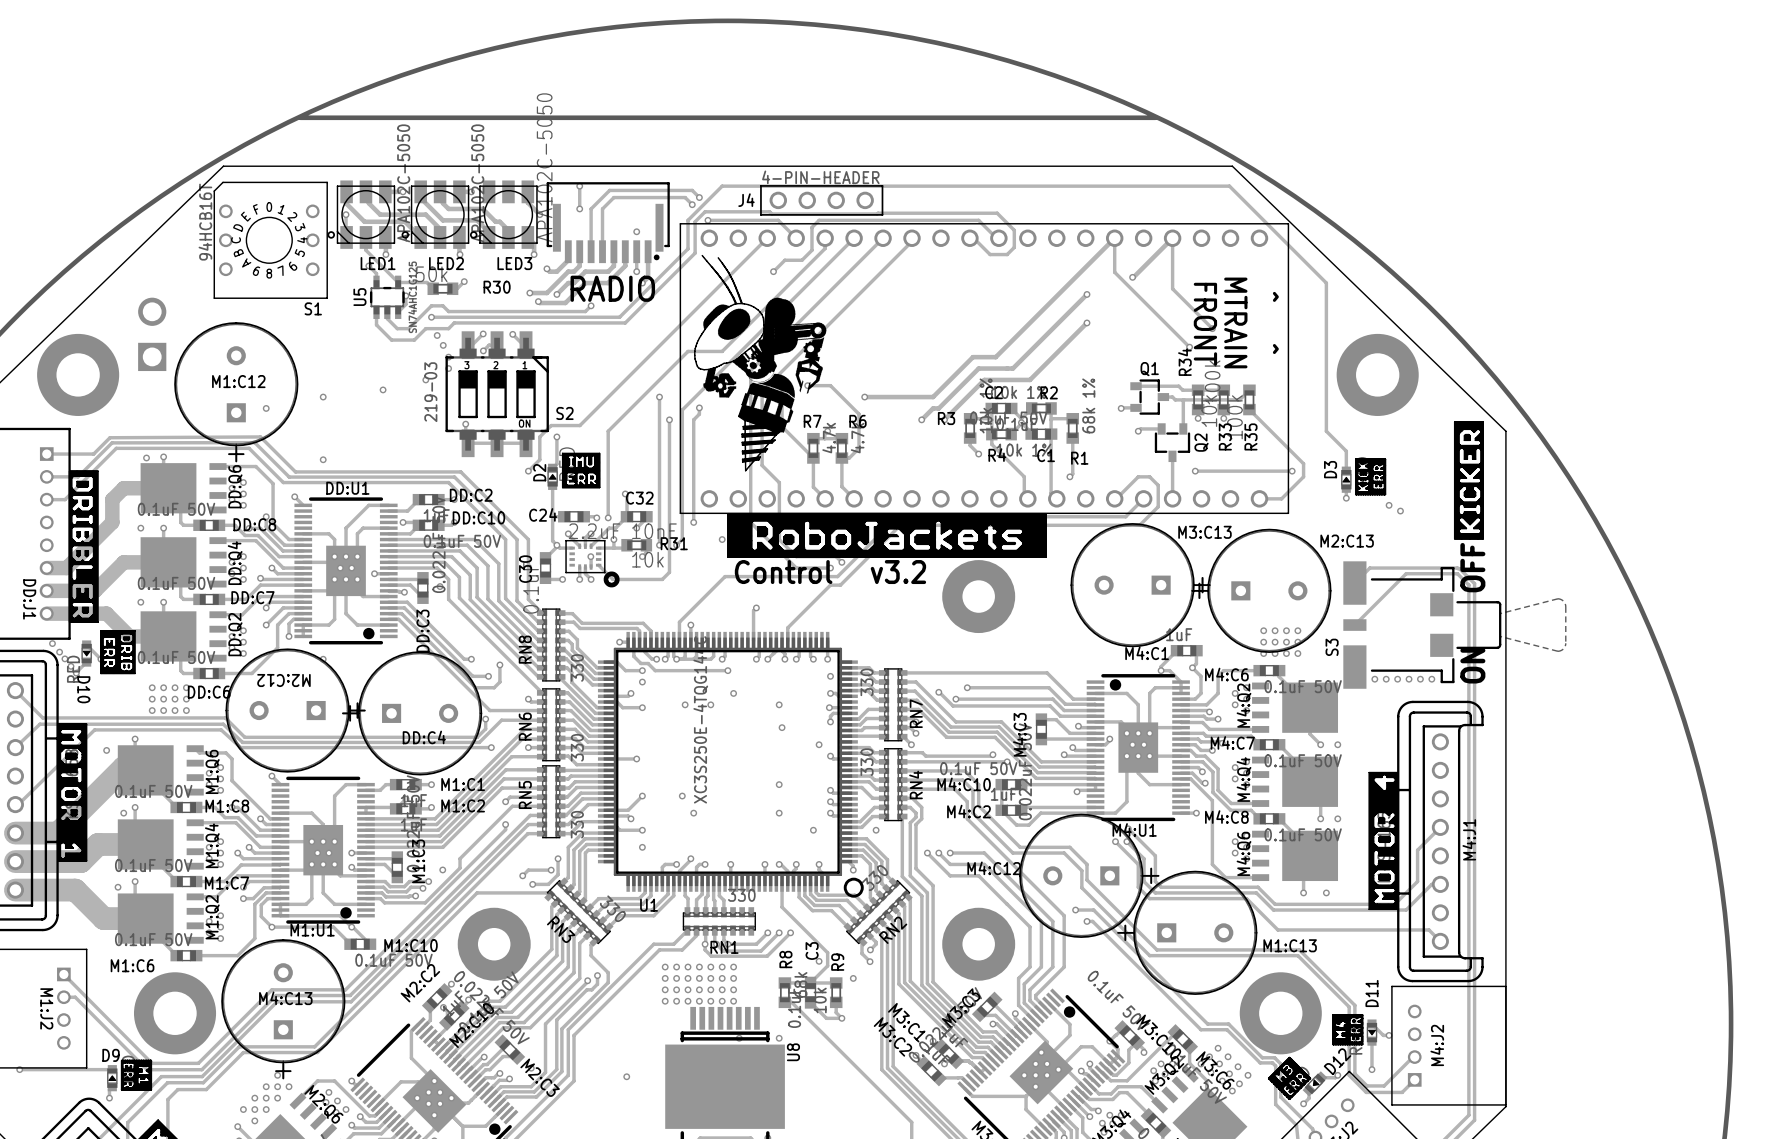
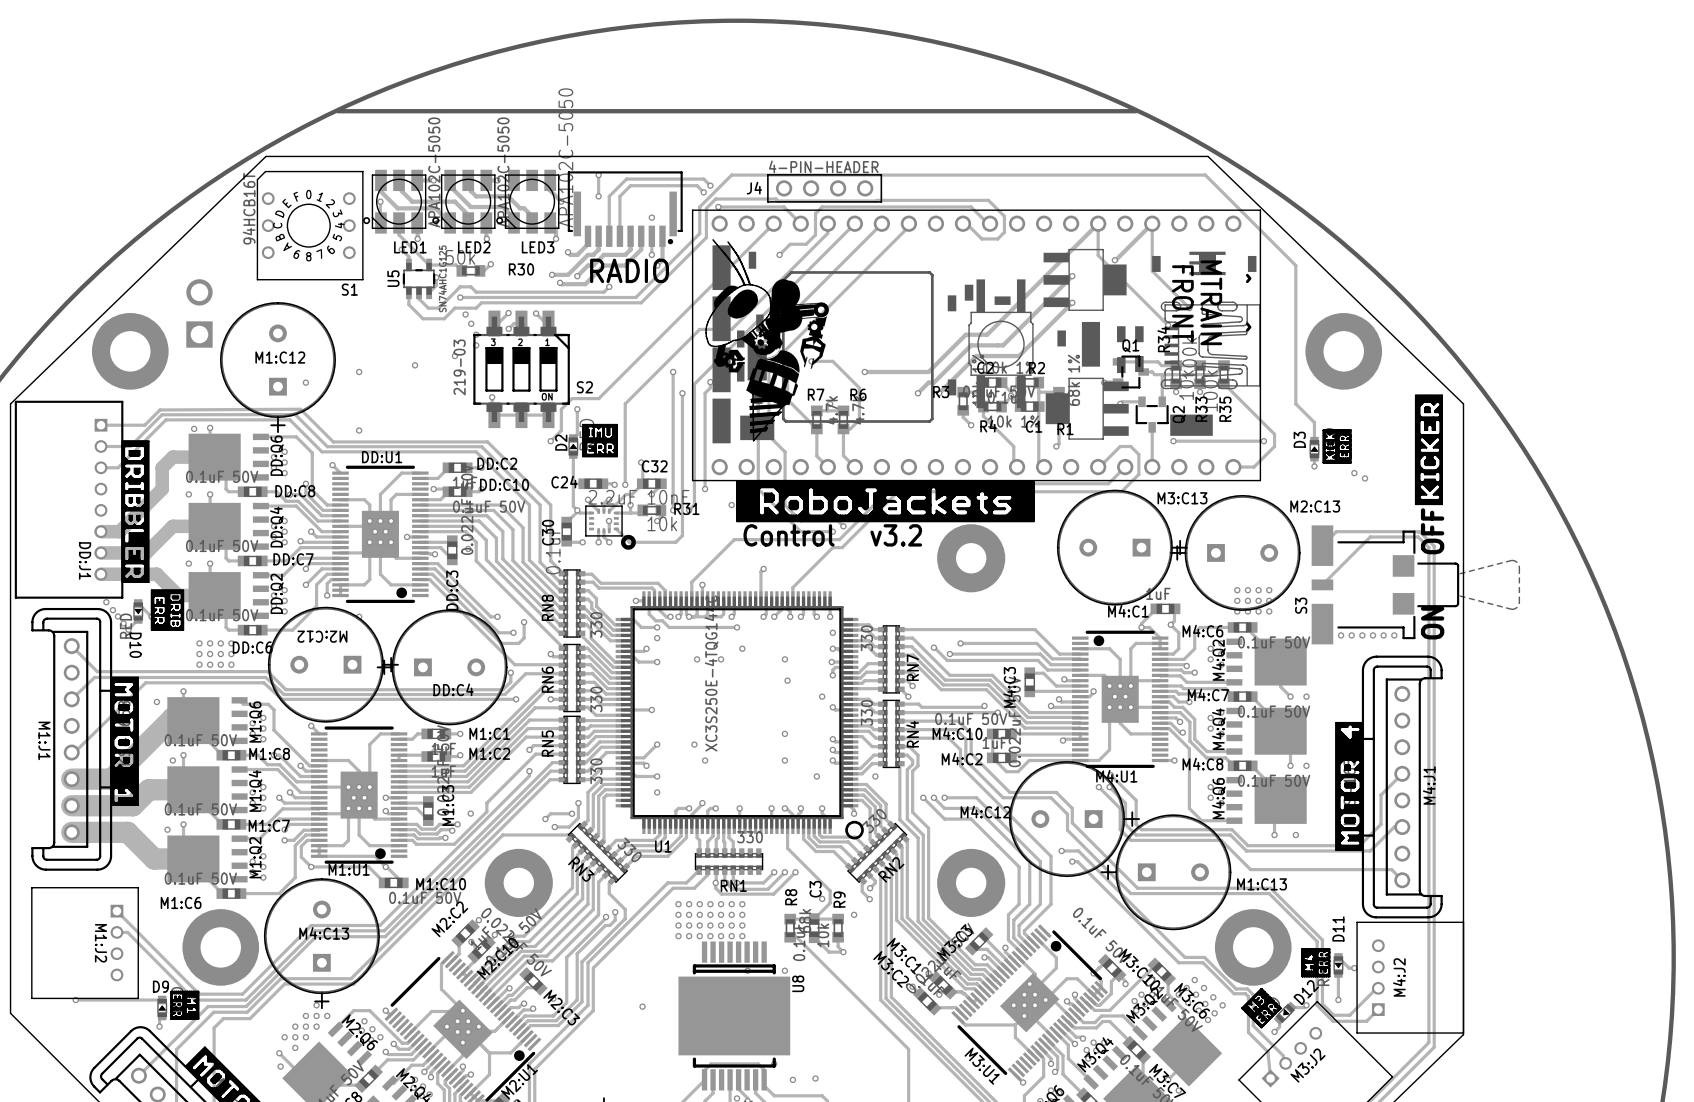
part footprint: [679, 223, 1290, 515] -> [691, 209, 1262, 482]

